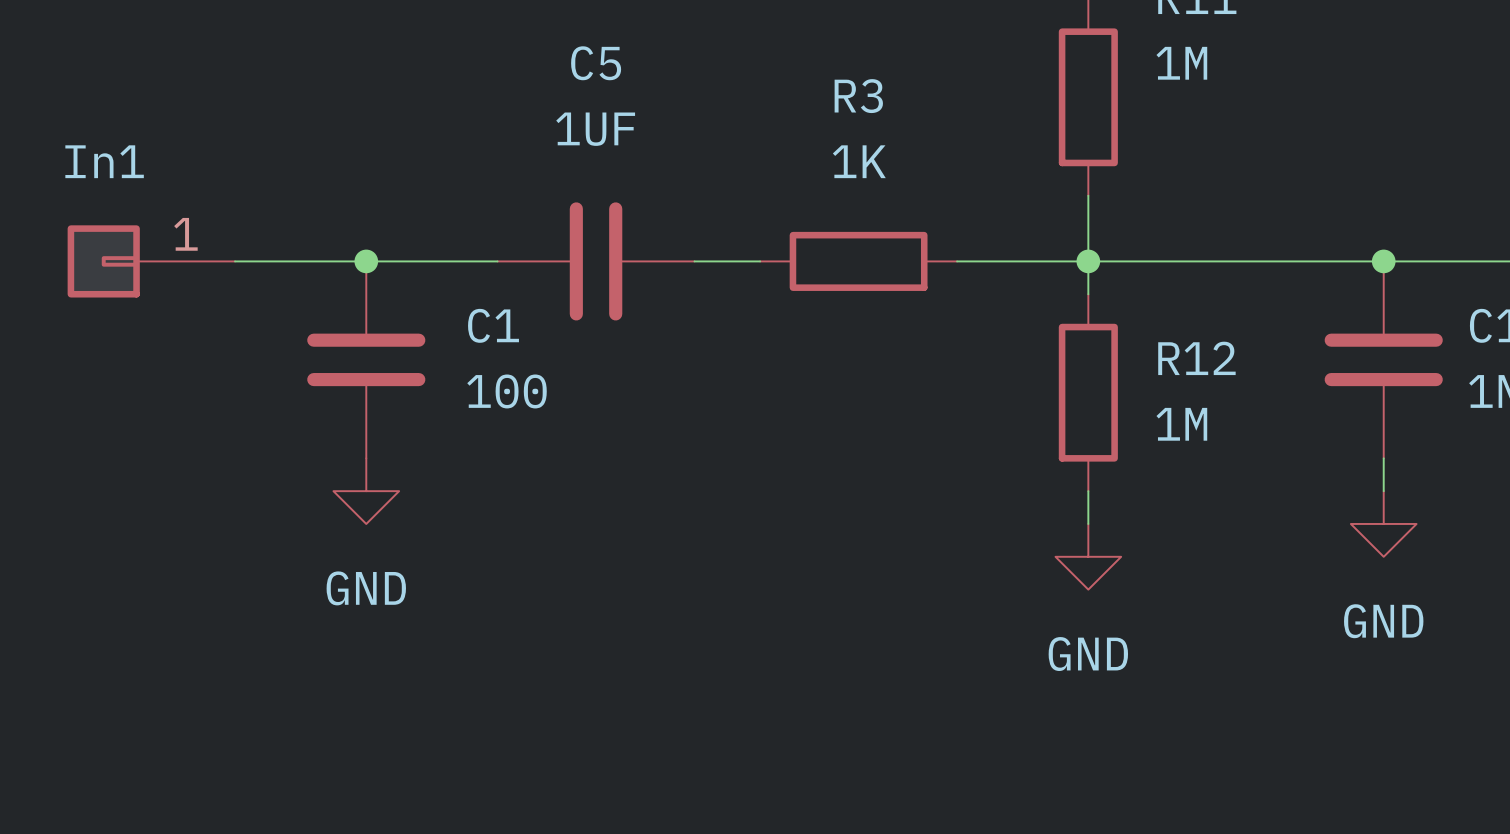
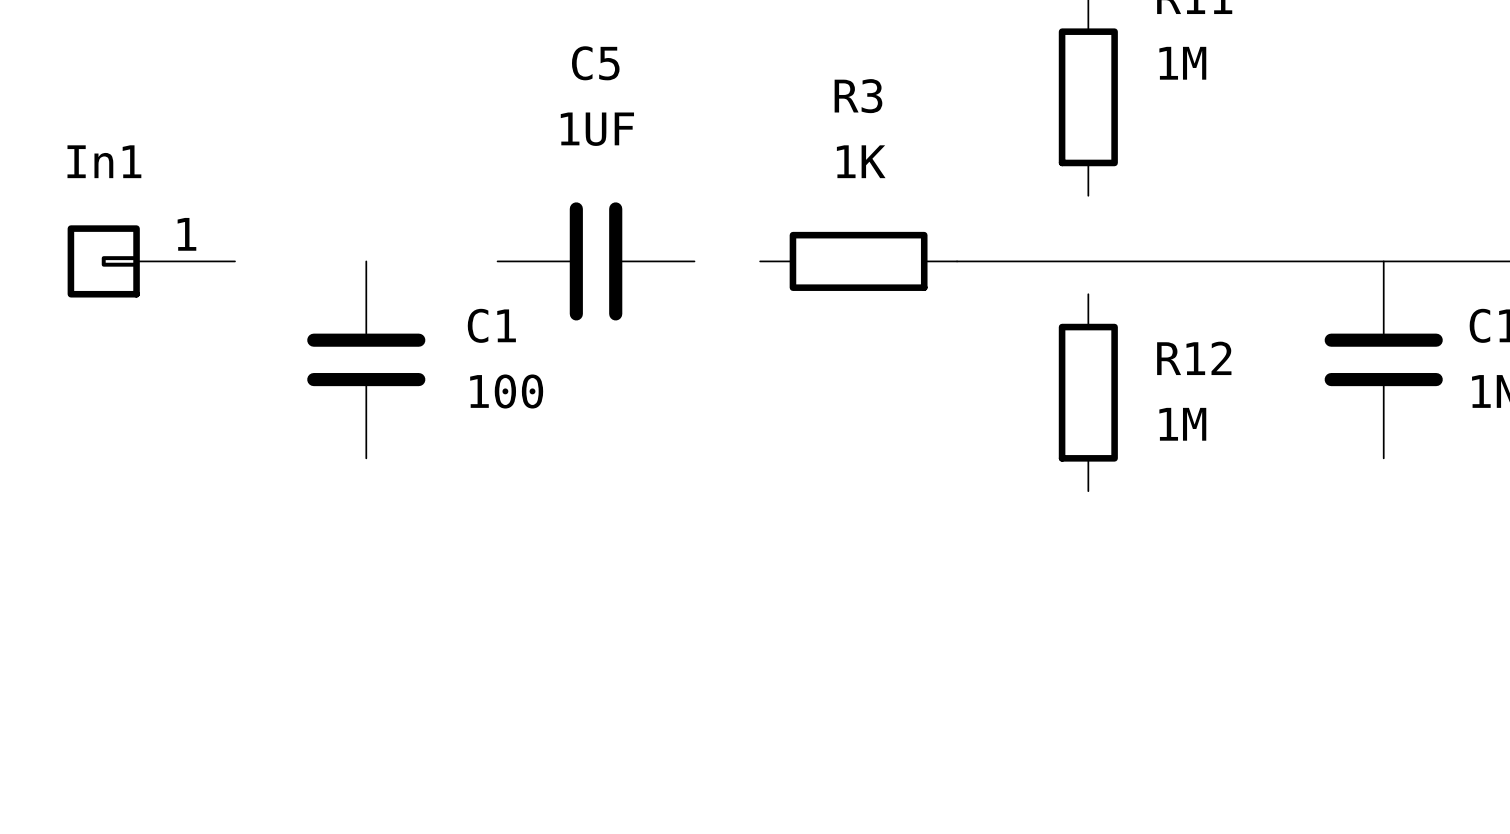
wire: (1088, 195) (1088, 294) -> none
wire: (235, 261) (497, 261) -> none
junction: (366, 261) -> none
wire: (694, 261) (760, 261) -> none
junction: (1088, 261) -> none
junction: (1383, 261) -> none
wire: (1383, 458) (1383, 491) -> none
power symbol: GND (366, 491) -> none
wire: (1088, 491) (1088, 523) -> none
power symbol: GND (1383, 523) -> none
power symbol: GND (1088, 556) -> none

